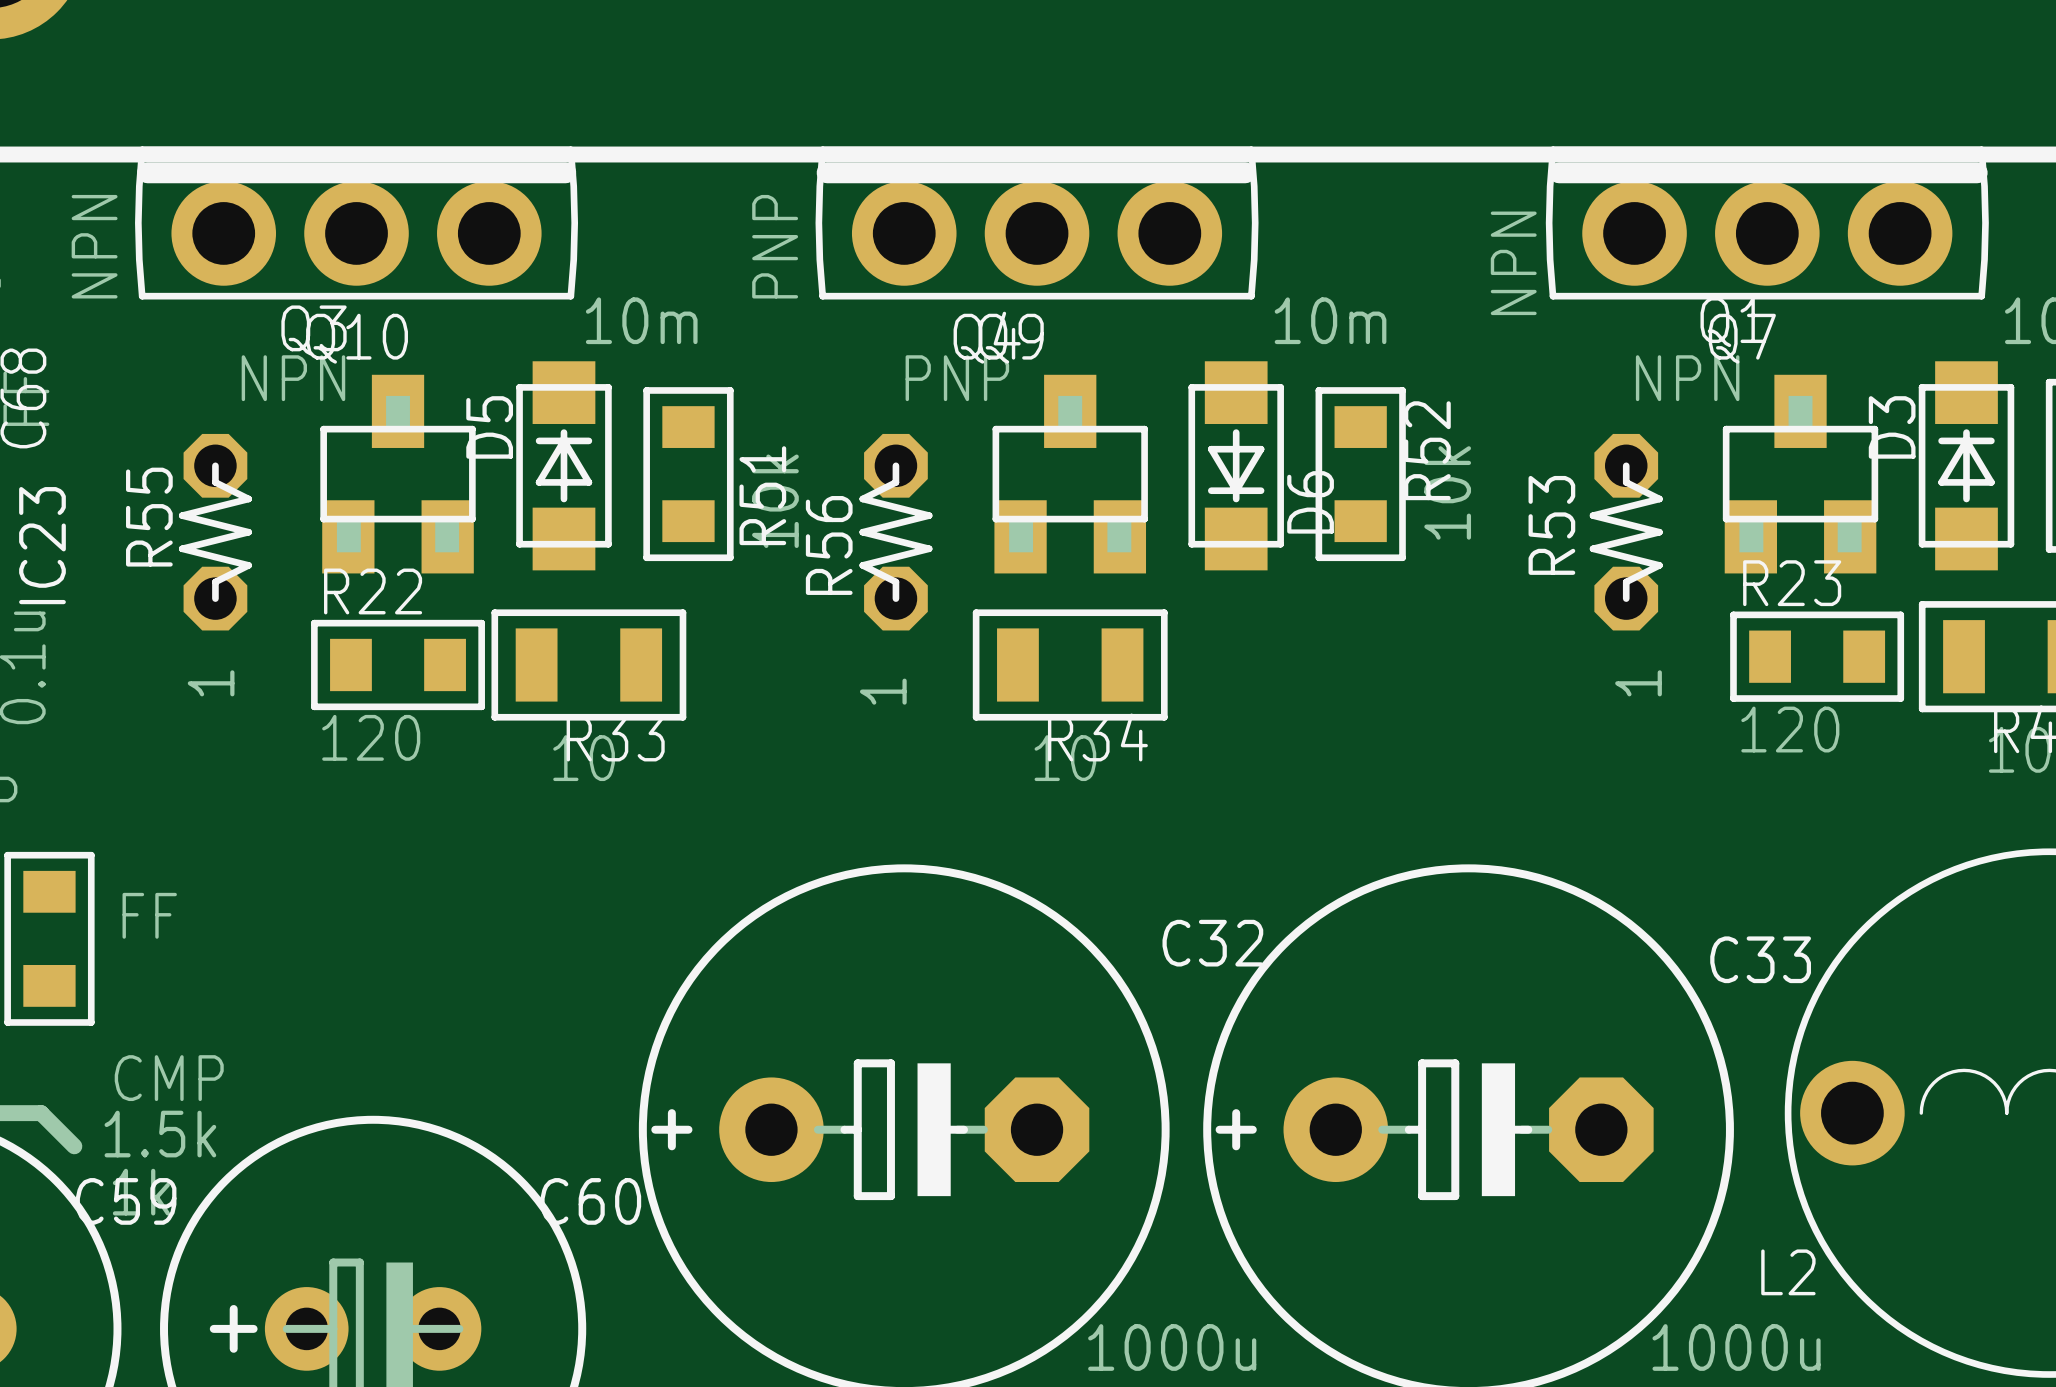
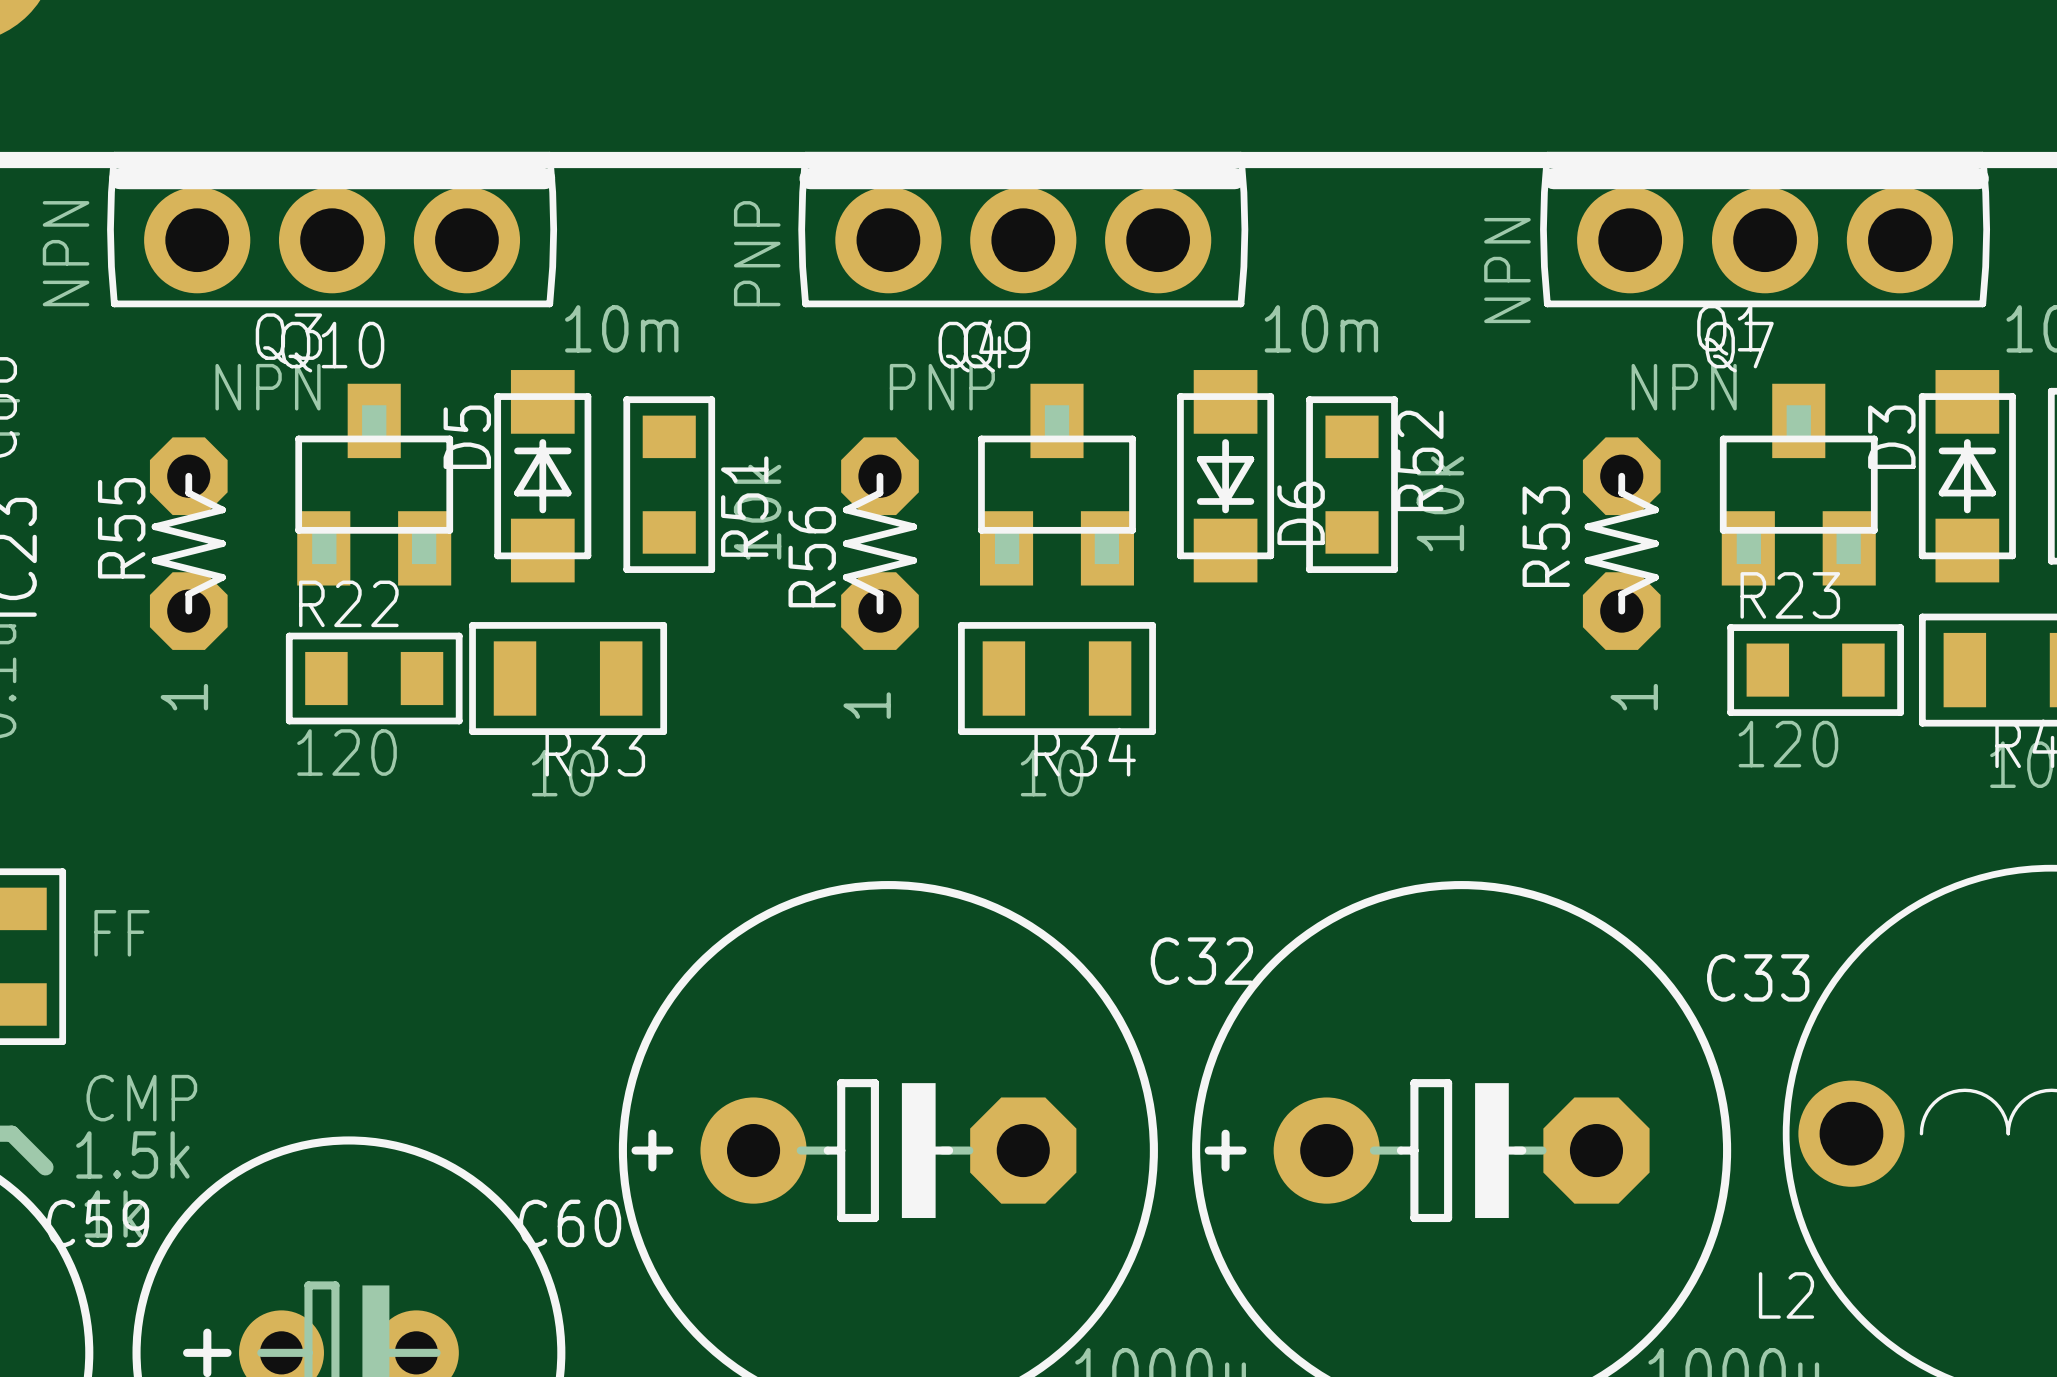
R55 footprint: [178, 433, 252, 631] -> [149, 437, 228, 650]
R56 footprint: [859, 433, 933, 631] -> [841, 437, 919, 650]
R53 footprint: [1589, 433, 1663, 631] -> [1582, 437, 1661, 650]

